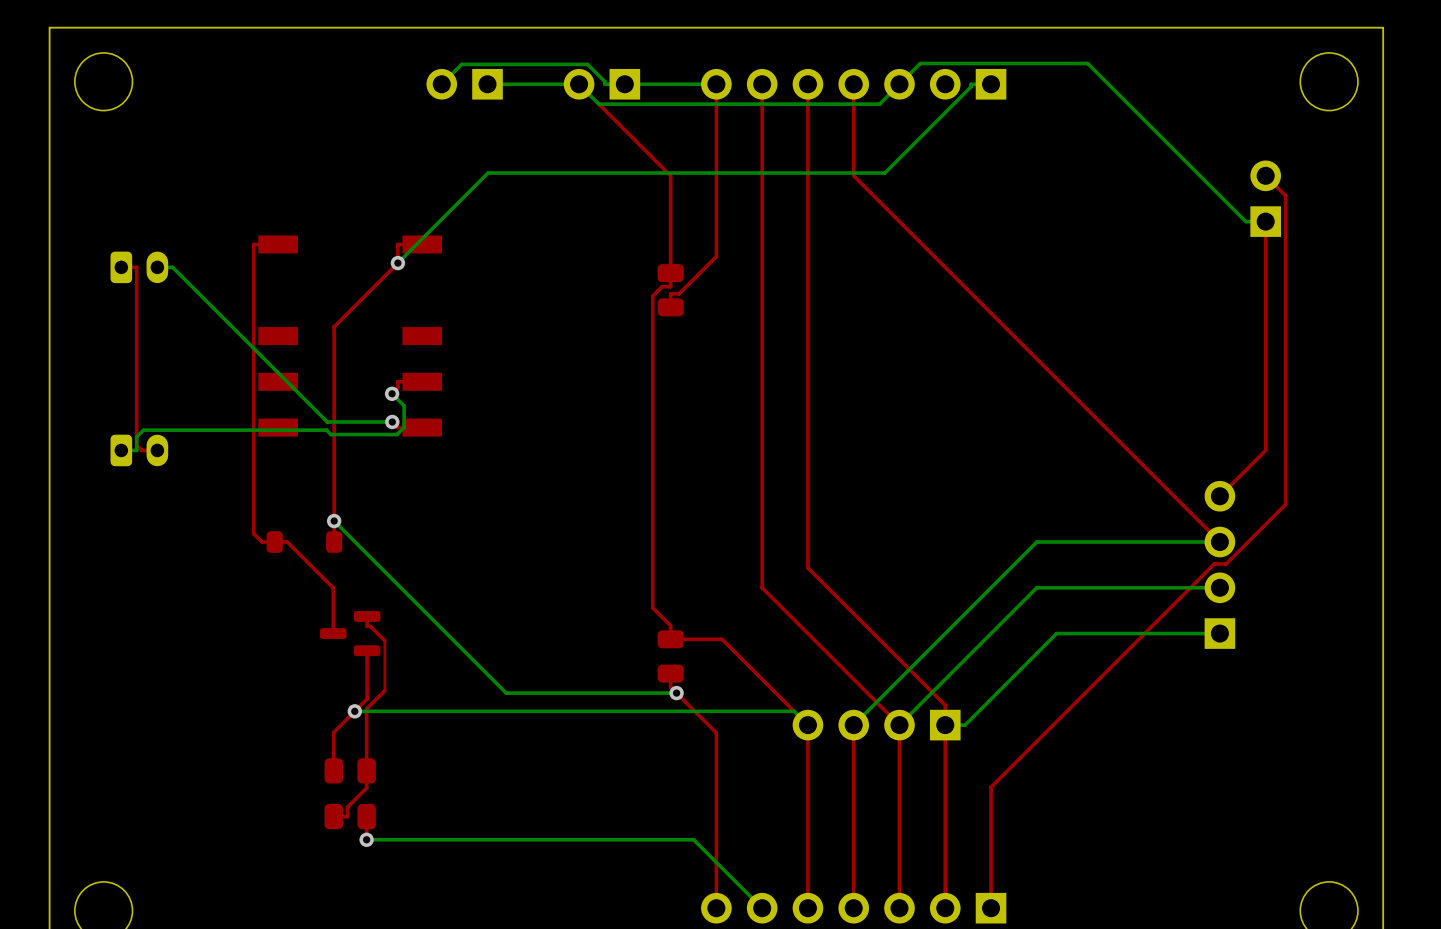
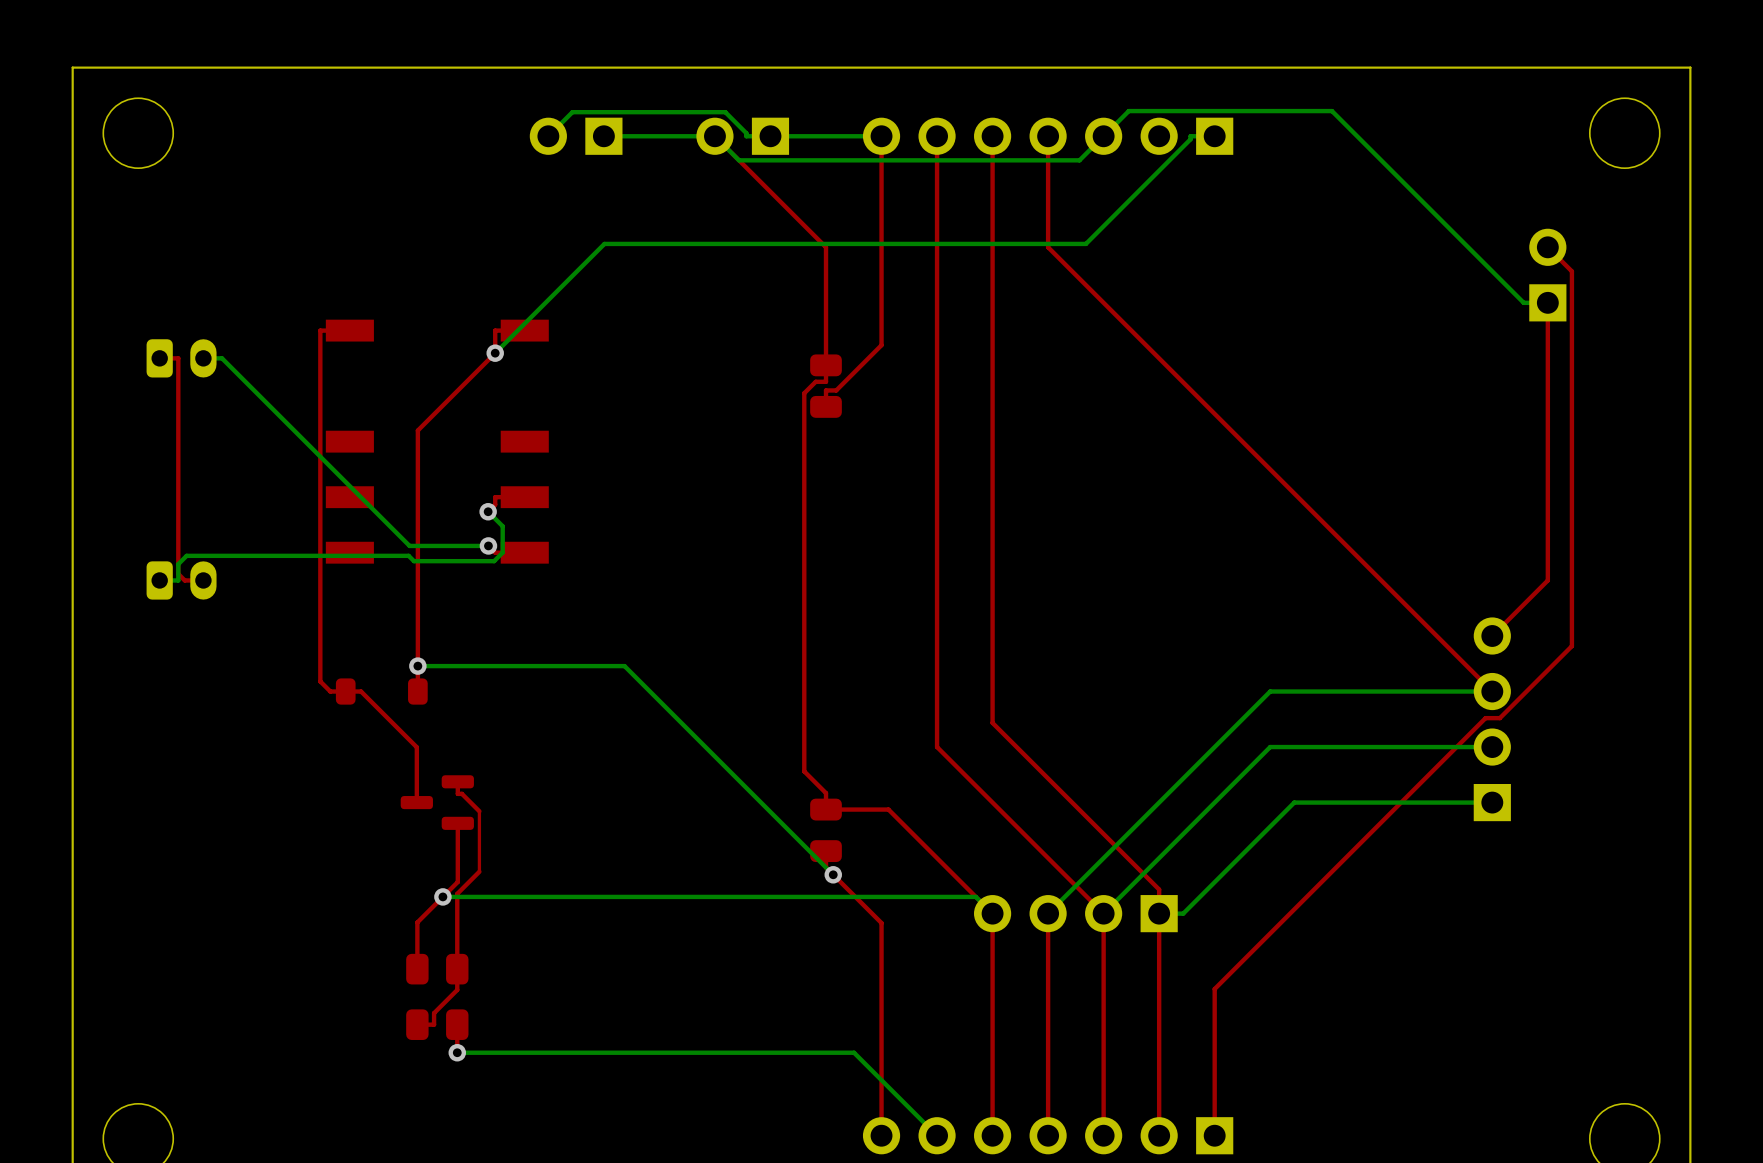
bottom track: (334, 521) (506, 693) (676, 693) -> (417, 666) (624, 666) (833, 874)

